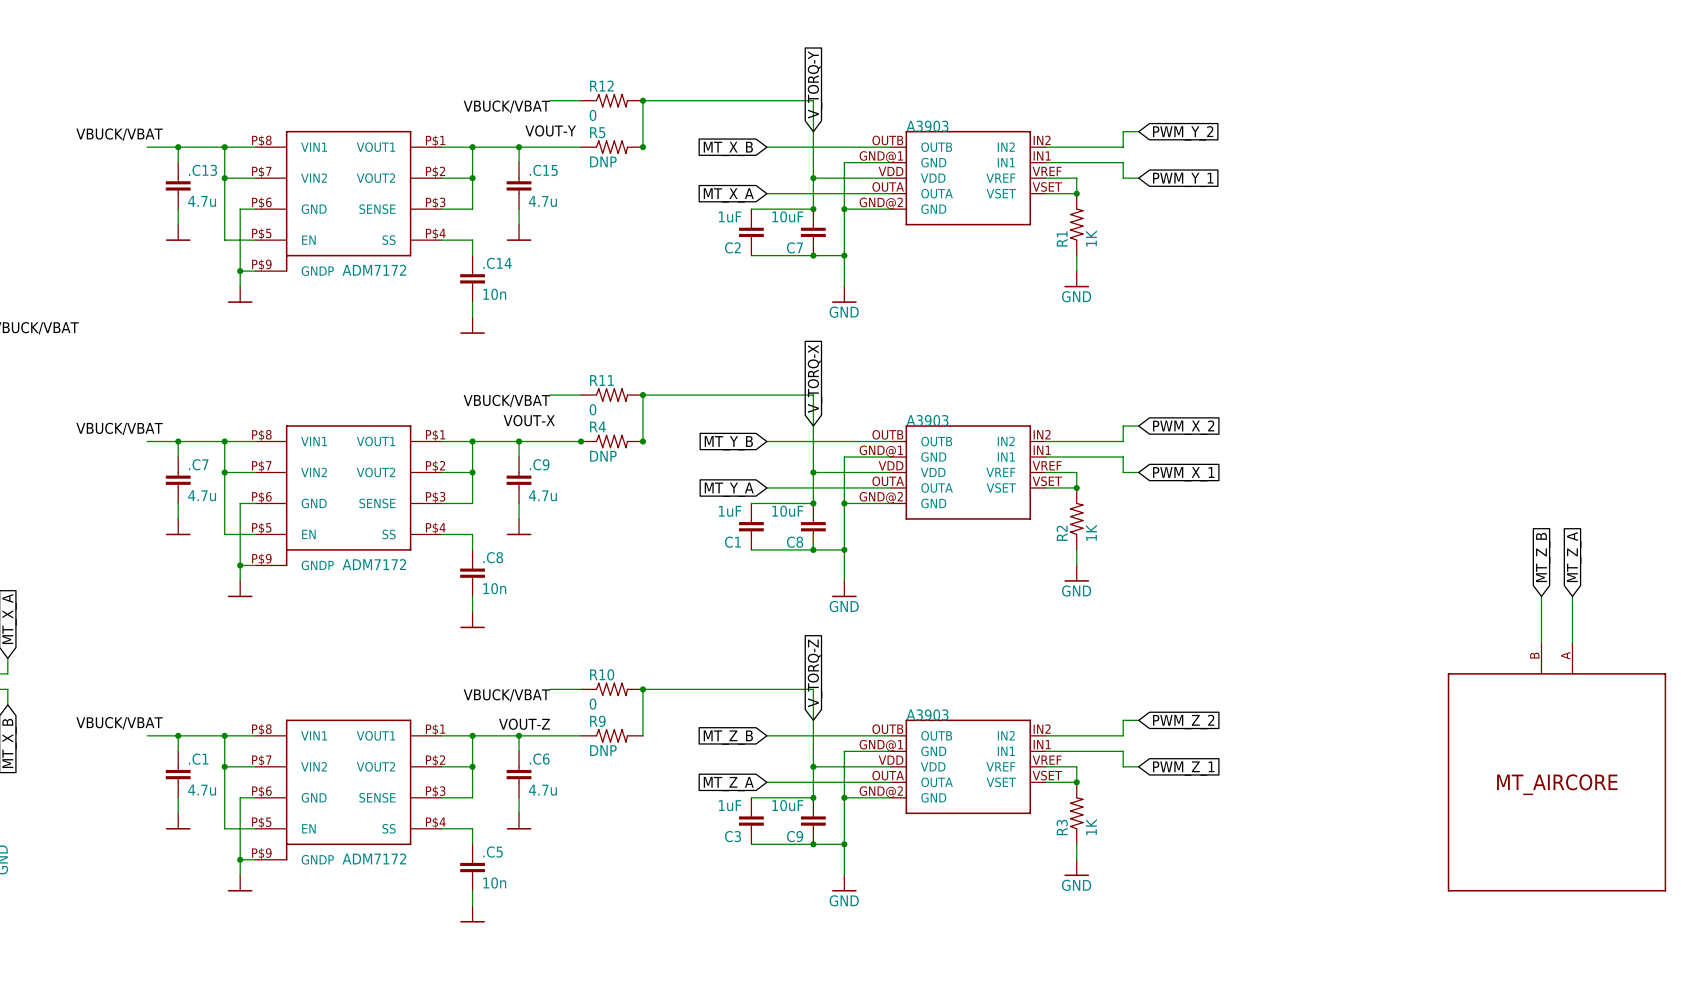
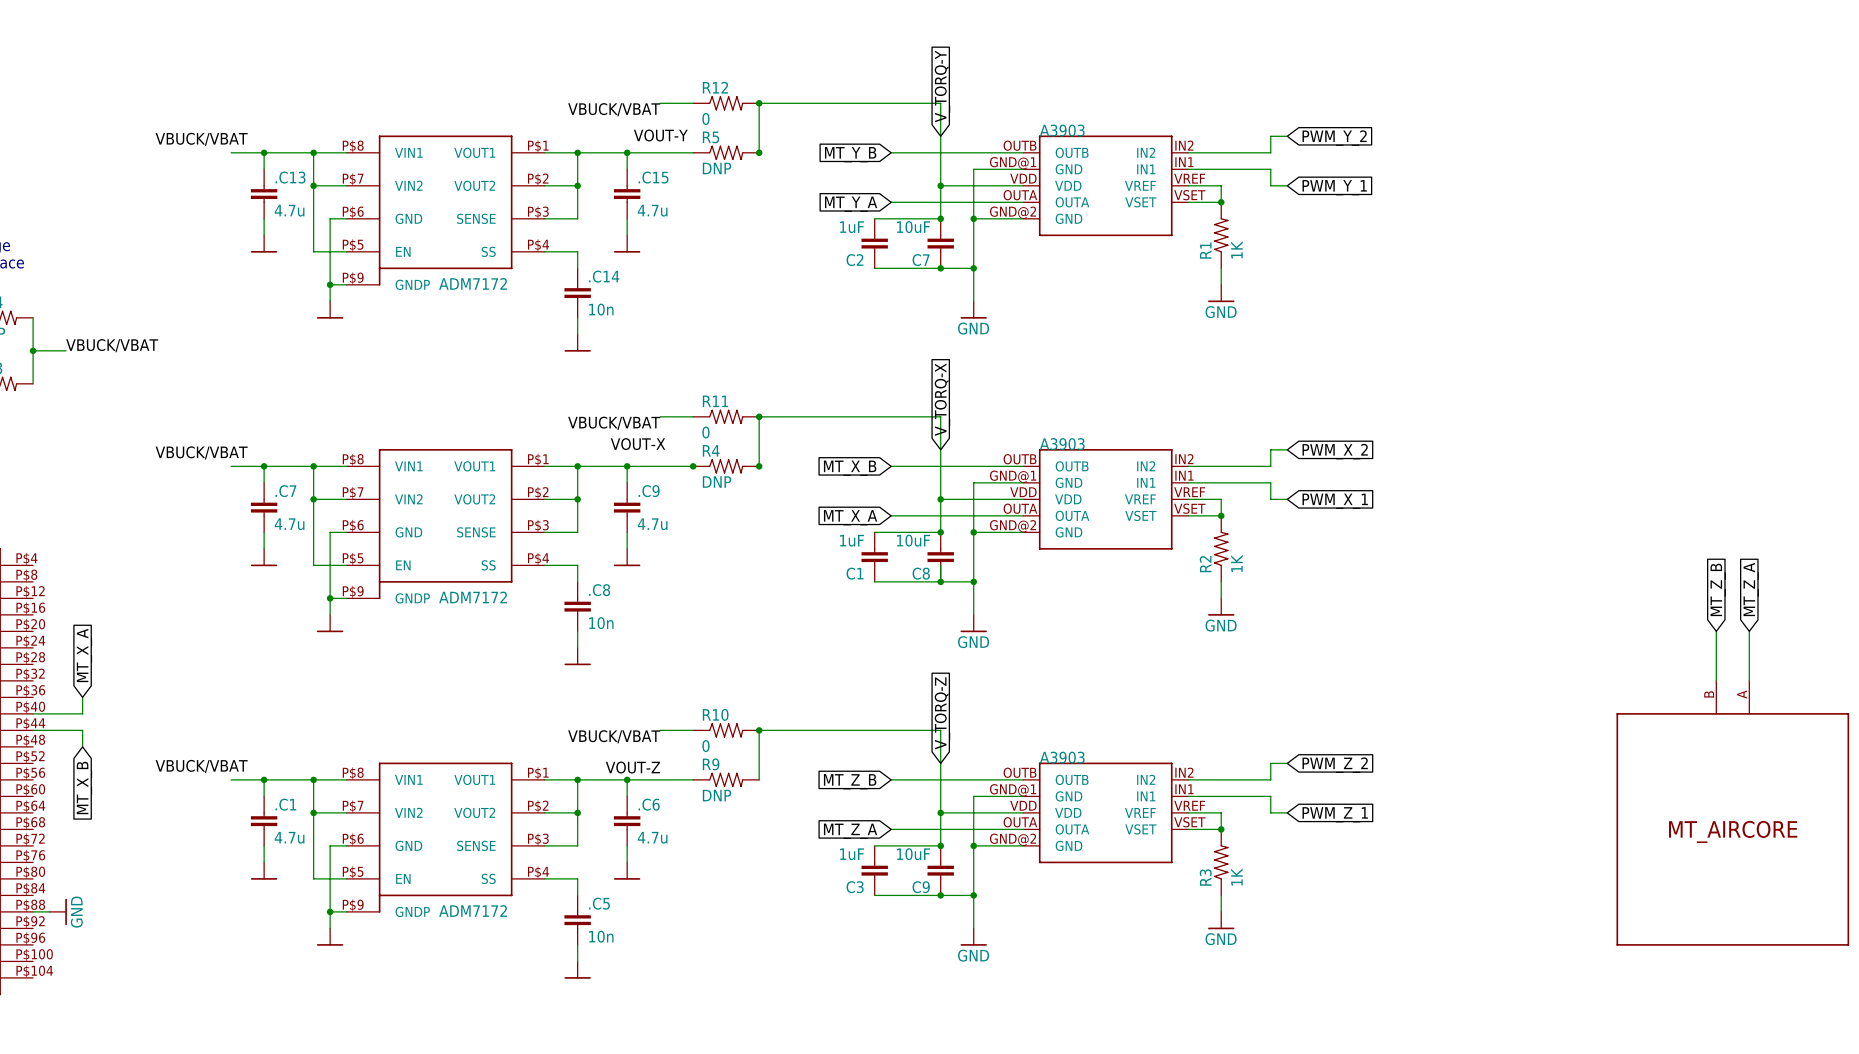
global label: MT_X_B (728, 148) -> MT_Y_B (850, 154)
global label: MT_X_A (728, 195) -> MT_Y_A (851, 204)
global label: MT_Y_B (728, 443) -> MT_X_B (850, 468)
global label: MT_Y_A (729, 489) -> MT_X_A (850, 517)

